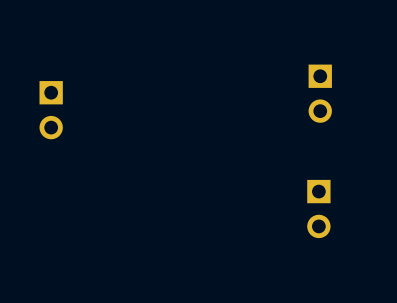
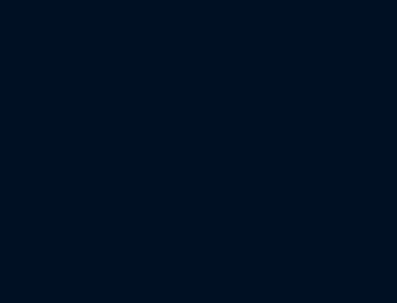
part: (320, 93) -> none
part: (51, 110) -> none
part: (318, 209) -> none

